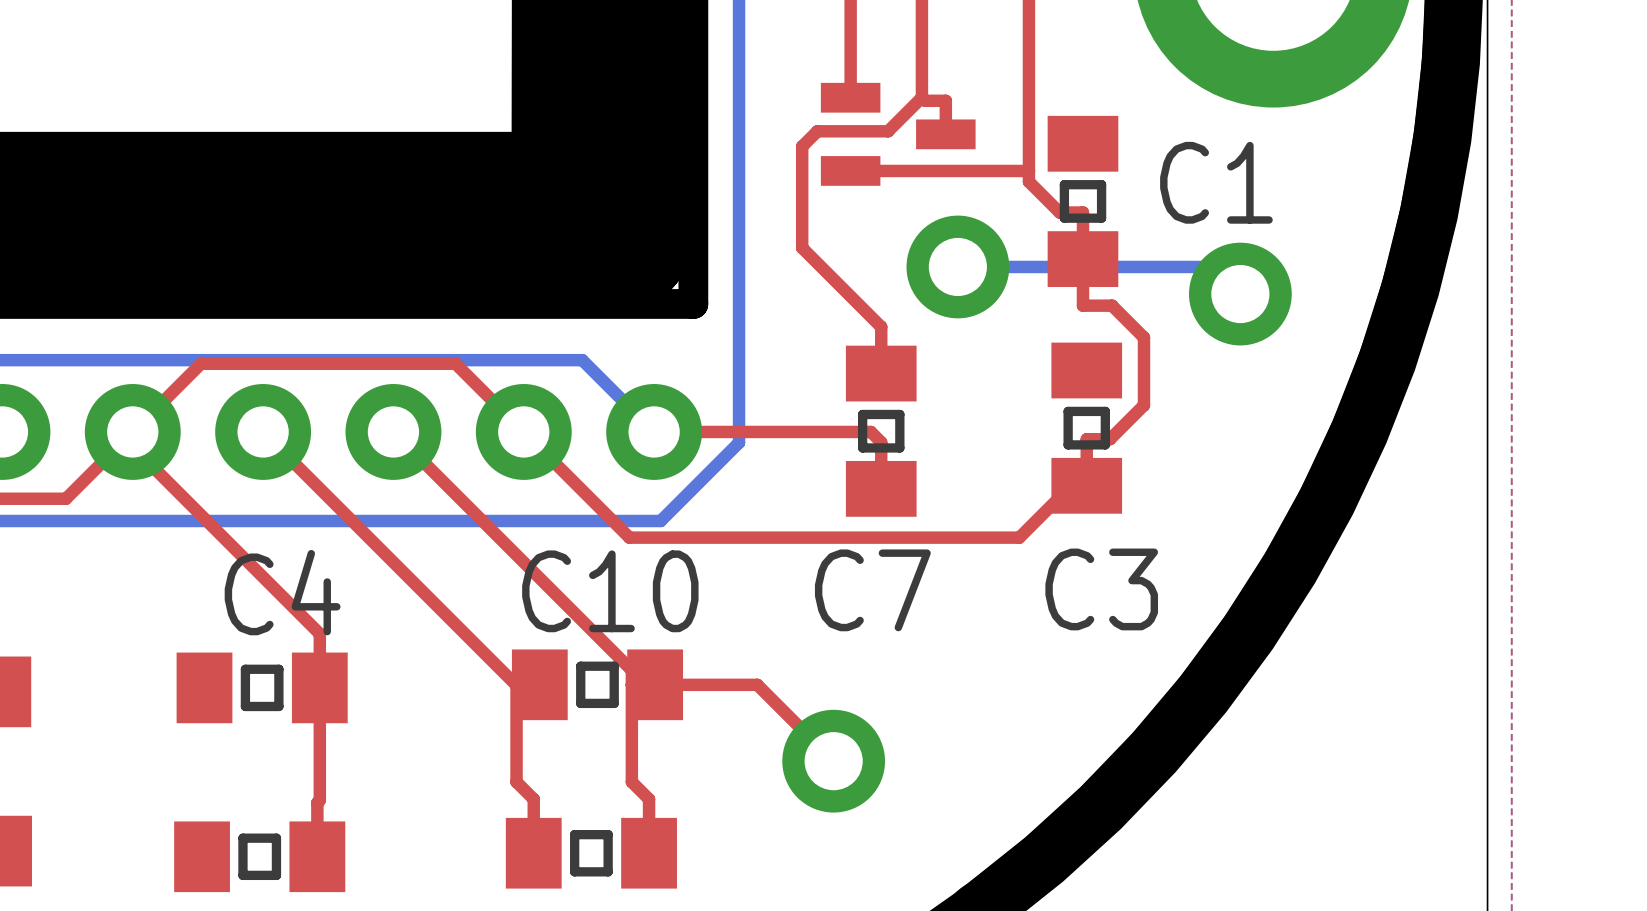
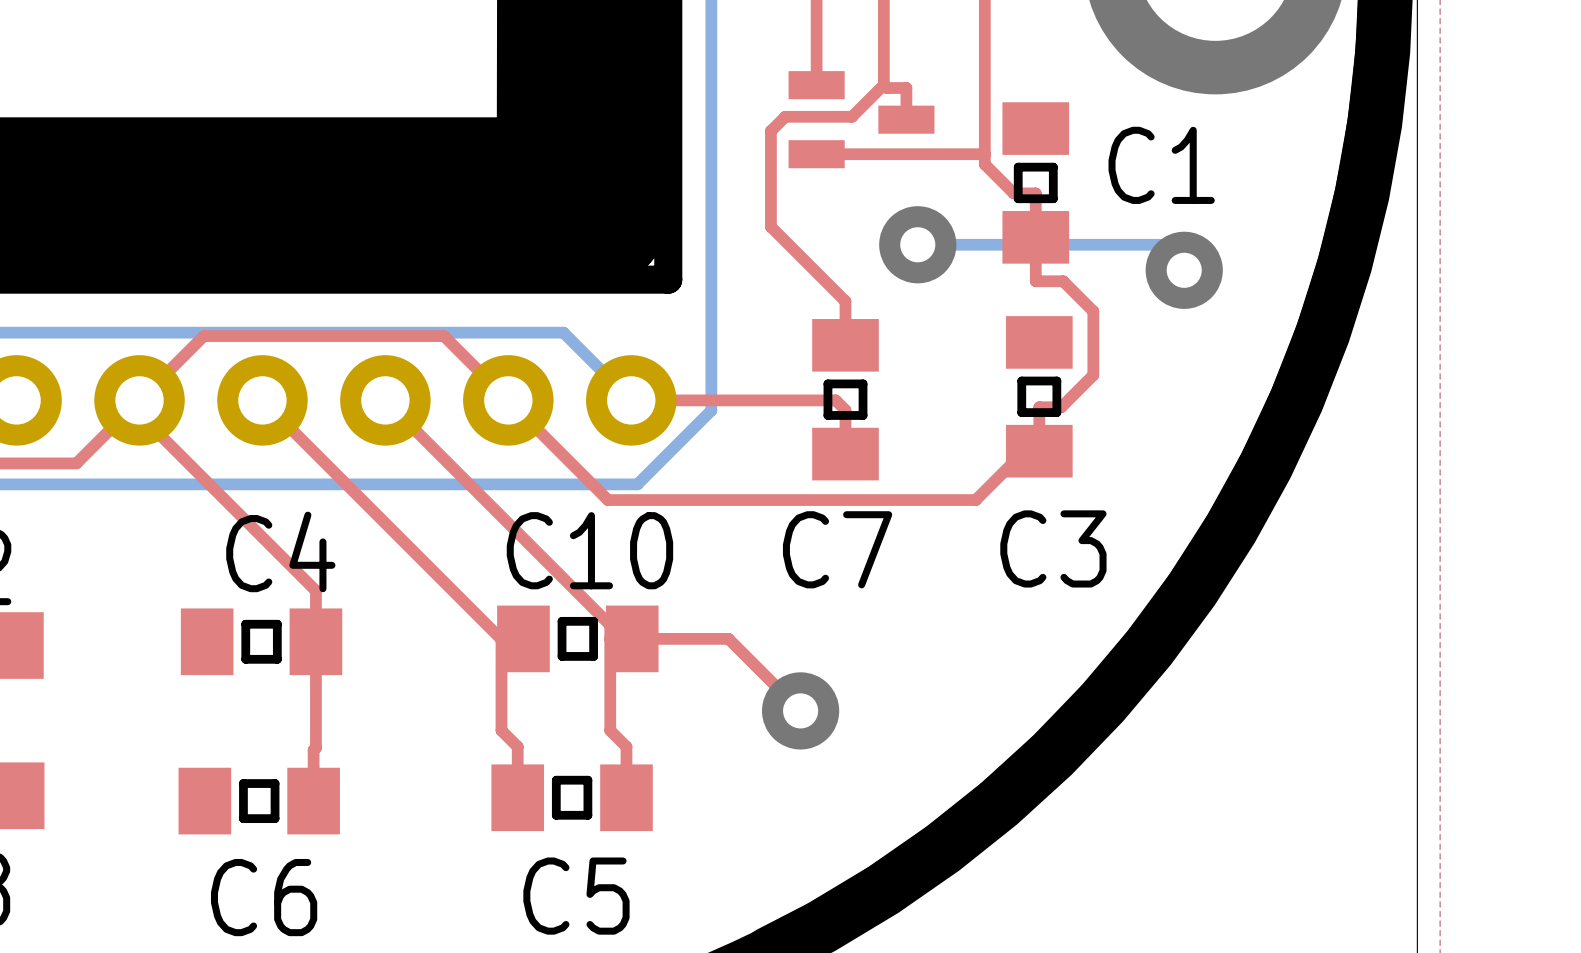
via size: [906, 215, 1010, 319] -> [879, 206, 957, 284]
via size: [1189, 242, 1292, 346] -> [1145, 231, 1223, 309]
via size: [782, 709, 886, 813] -> [762, 672, 840, 750]

